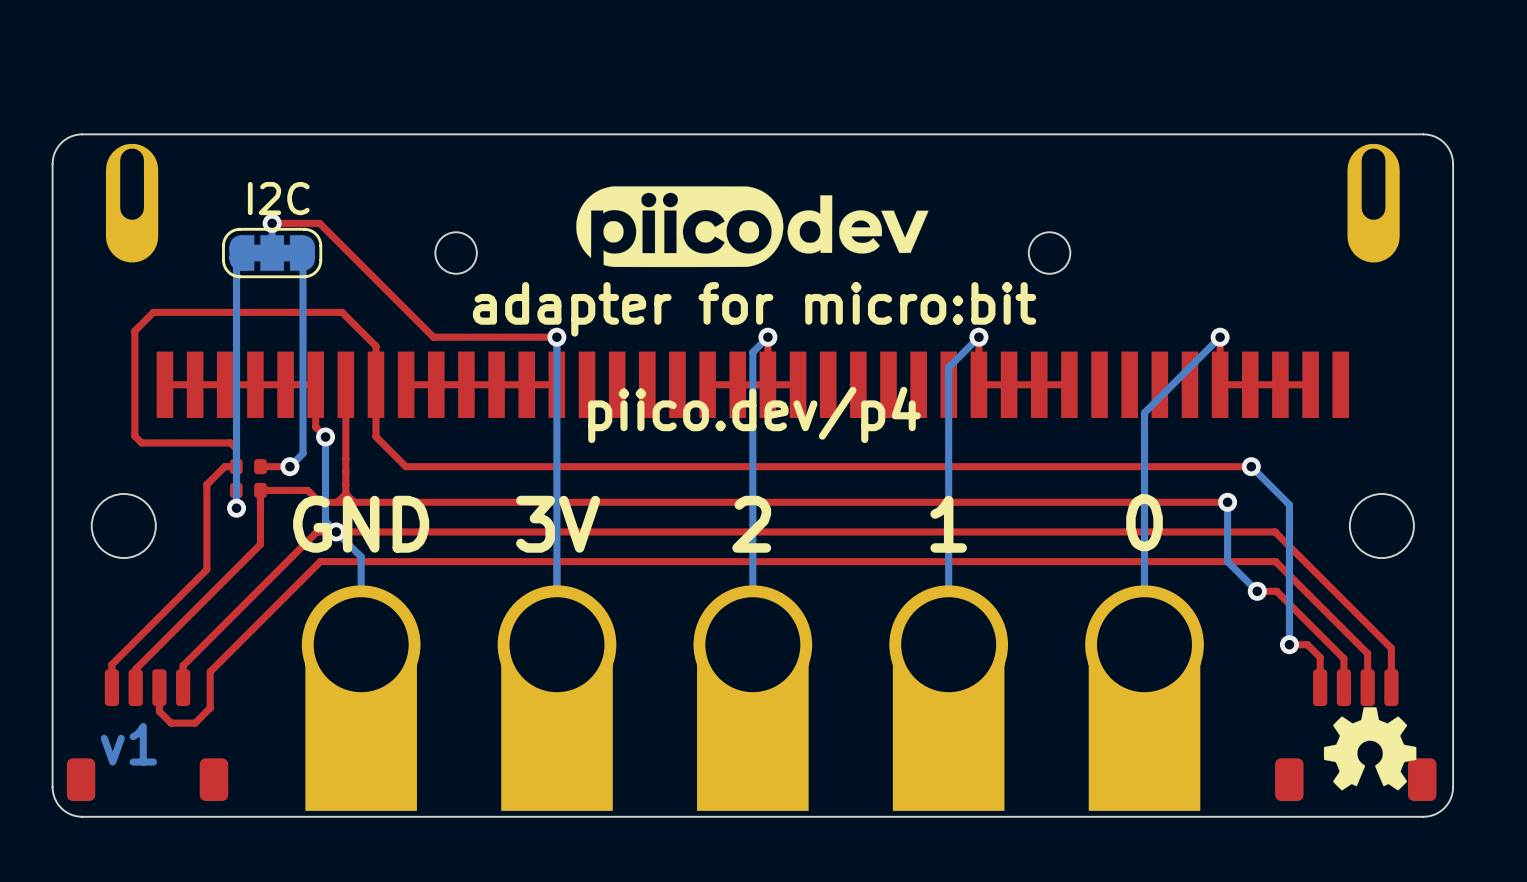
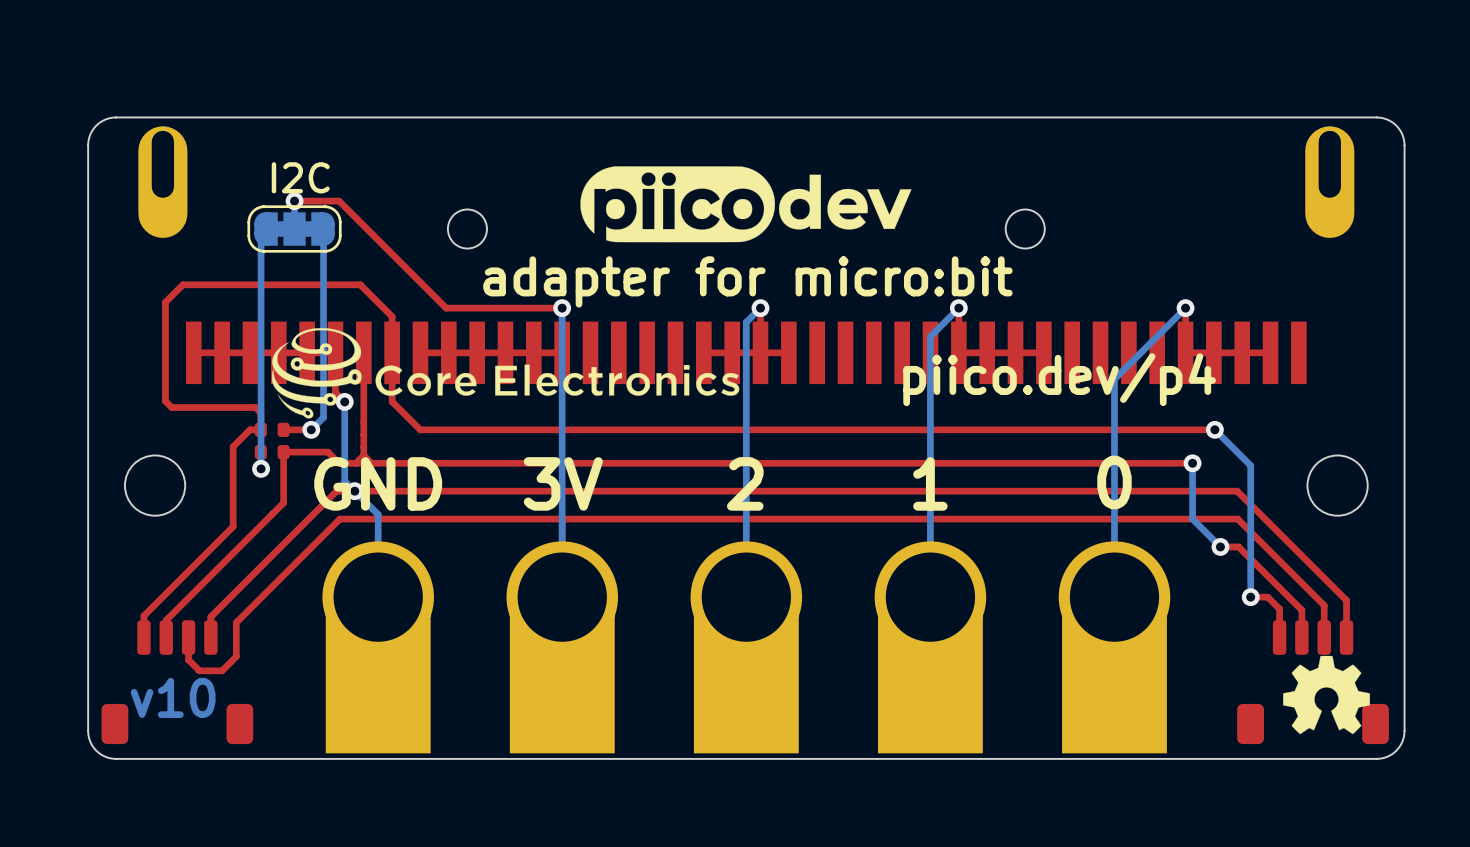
drawing: none -> [272, 328, 740, 419]
text position: piico.dev/p4 (754, 414) -> piico.dev/p4 (1059, 379)
text: v1 (128, 744) -> v10 (173, 697)

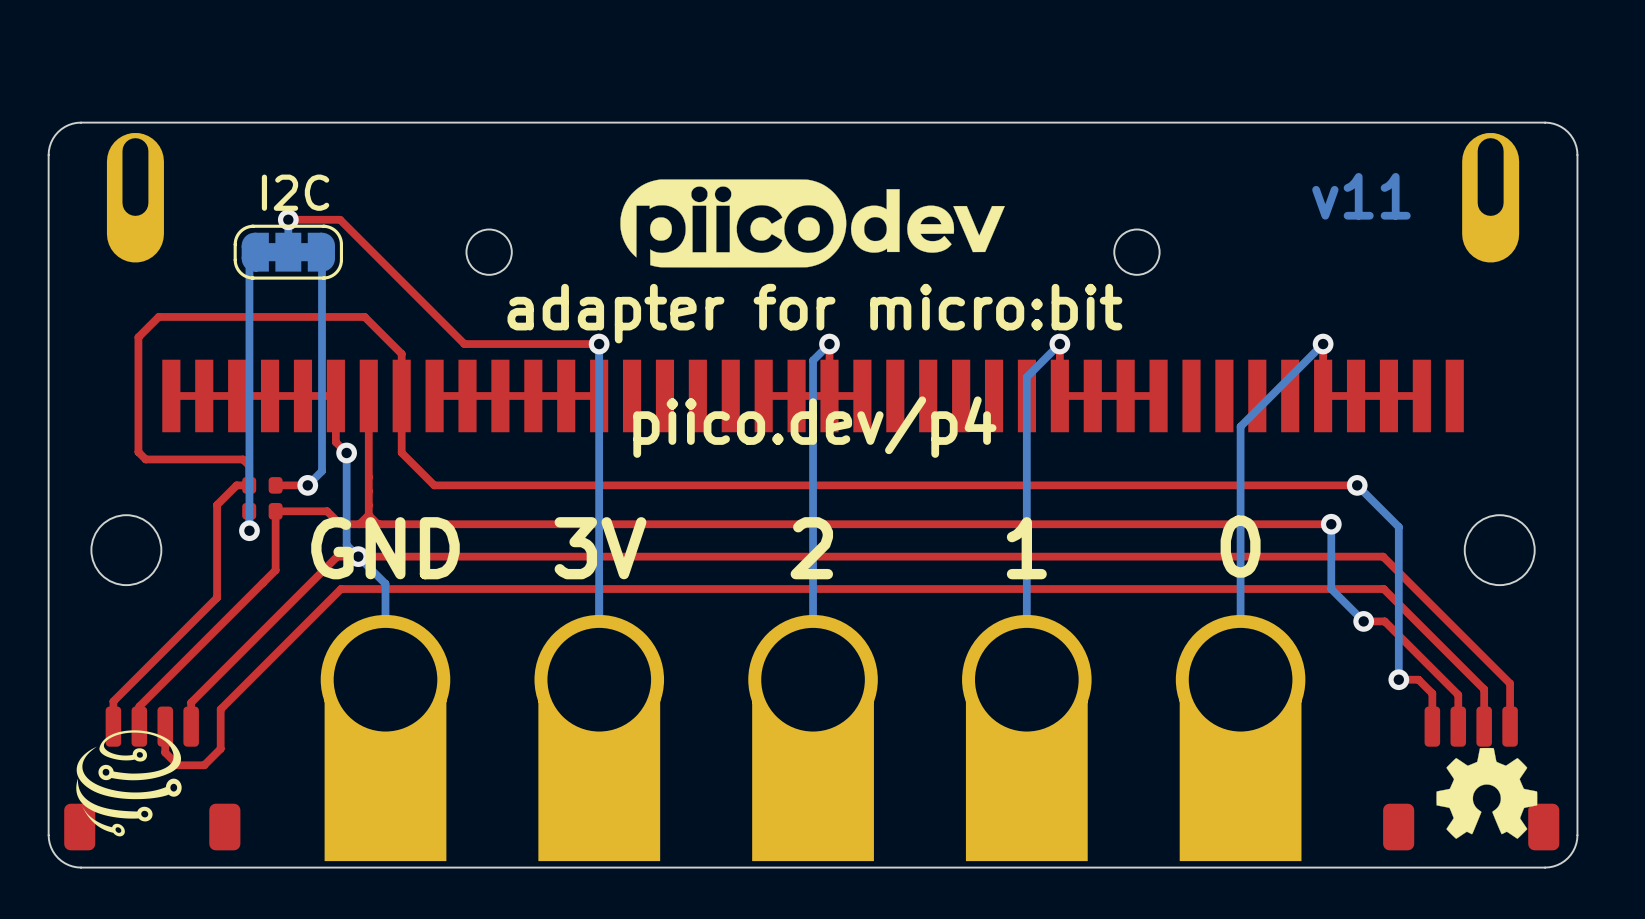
text: none -> v11 (1361, 196)
drawing: [272, 328, 740, 419] -> none
text position: piico.dev/p4 (1059, 379) -> piico.dev/p4 (814, 427)
drawing: none -> [76, 730, 182, 837]
text: v10 (173, 697) -> none

